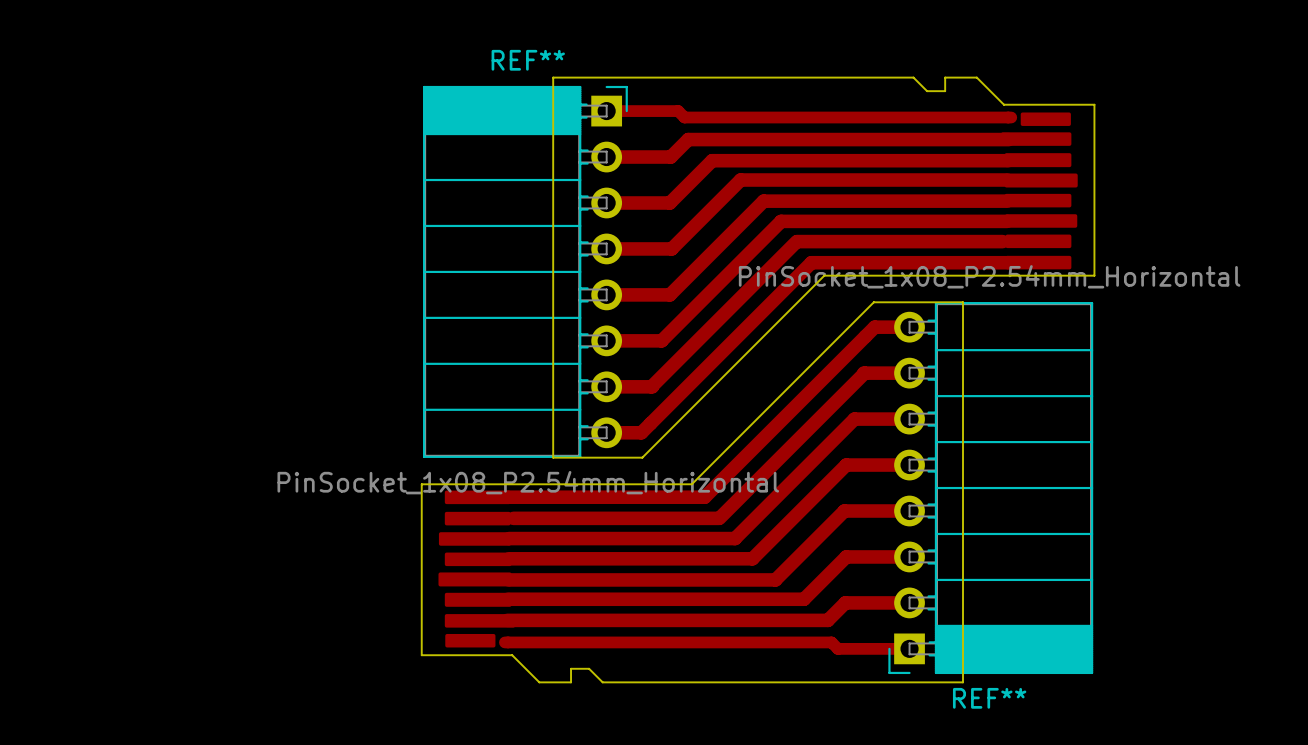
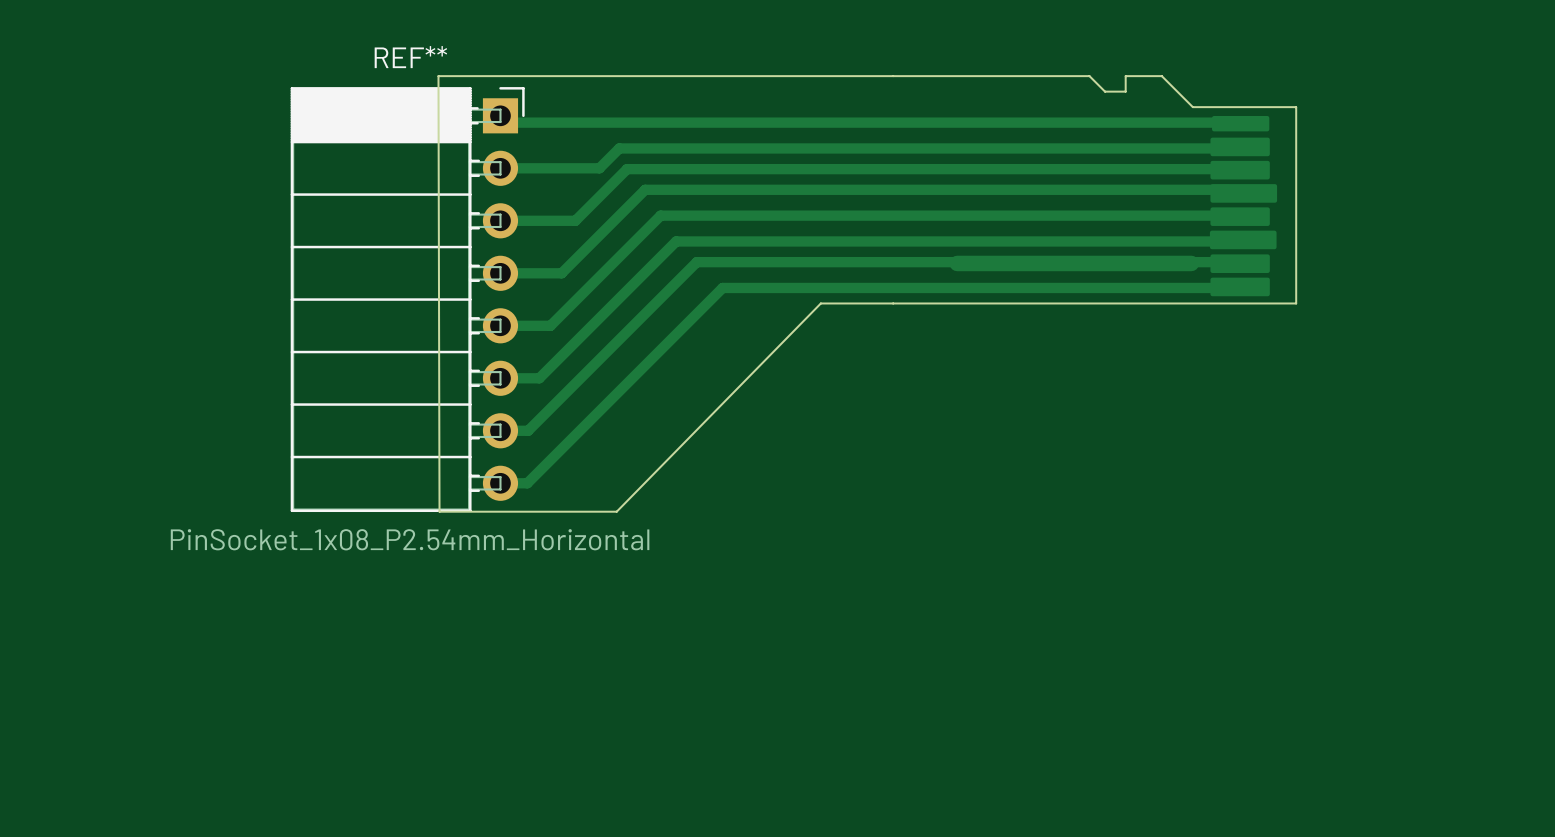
board edge: (553, 77) (553, 457) (642, 457) (824, 275) (1094, 275) -> (677, 76) (438, 76) (439, 511) (616, 511) (820, 303) (1296, 302)
track: none -> (500, 115) (507, 122) (1234, 122)
track: (612, 117) (606, 111) (678, 111) (684, 117) (1011, 117) -> none
drawing shape: [1000, 132, 1072, 146] -> [1210, 137, 1270, 157]
track: (1008, 139) (688, 139) (670, 157) (606, 157) -> none
track: none -> (1229, 148) (619, 148) (599, 168) (500, 168)
drawing shape: [1004, 153, 1072, 168] -> [1210, 160, 1270, 180]
track: none -> (1234, 169) (627, 169) (575, 220) (500, 220)
track: (1008, 160) (712, 160) (669, 202) (606, 202) -> none
drawing shape: [1004, 173, 1078, 188] -> [1210, 184, 1278, 203]
track: none -> (1229, 189) (645, 189) (561, 273) (500, 273)
track: (1007, 180) (740, 180) (671, 248) (606, 248) -> none
drawing shape: [1004, 193, 1072, 208] -> [1210, 207, 1270, 226]
track: none -> (1234, 215) (660, 215) (550, 325) (500, 325)
track: (1007, 201) (763, 201) (669, 294) (606, 294) -> none
drawing shape: [1005, 214, 1078, 228] -> [1209, 230, 1277, 250]
track: (1007, 221) (781, 221) (661, 340) (606, 340) -> none
track: none -> (1234, 241) (676, 241) (539, 378) (500, 378)
drawing shape: [1005, 234, 1072, 249] -> [1210, 254, 1270, 273]
track: none -> (1234, 262) (696, 262) (528, 430) (500, 430)
track: (796, 241) (651, 386) -> none
drawing shape: [1005, 255, 1072, 270] -> [1210, 277, 1270, 297]
track: (1008, 262) (811, 262) (641, 432) (606, 432) -> none
track: none -> (1239, 287) (722, 287) (527, 483) (500, 483)
REF** position: (525, 271) -> (407, 299)
board edge: (873, 302) (963, 302) (963, 682) (602, 682) (589, 668) (571, 668) (571, 682) (539, 682) (512, 655) (421, 655) (421, 484) (691, 484) (873, 302) -> none
track: (909, 327) (874, 327) (704, 497) (508, 497) -> none
track: (863, 373) (915, 373) -> none
track: (864, 373) (719, 518) -> none
track: (601, 386) (652, 386) -> none
track: (909, 419) (854, 419) (735, 538) (508, 538) -> none
track: (909, 465) (846, 465) (752, 558) (508, 558) -> none
REF**: PinSocket_1x08_P2.54mm_Horizontal (990, 488) -> none
drawing: [438, 490, 516, 648] -> none
track: (909, 511) (844, 511) (775, 579) (508, 579) -> none
track: (513, 518) (718, 518) -> none
track: (909, 556) (846, 556) (803, 599) (508, 599) -> none
track: (909, 602) (845, 602) (827, 620) (507, 620) -> none
track: (504, 642) (831, 642) (837, 648) (909, 648) (903, 642) -> none

